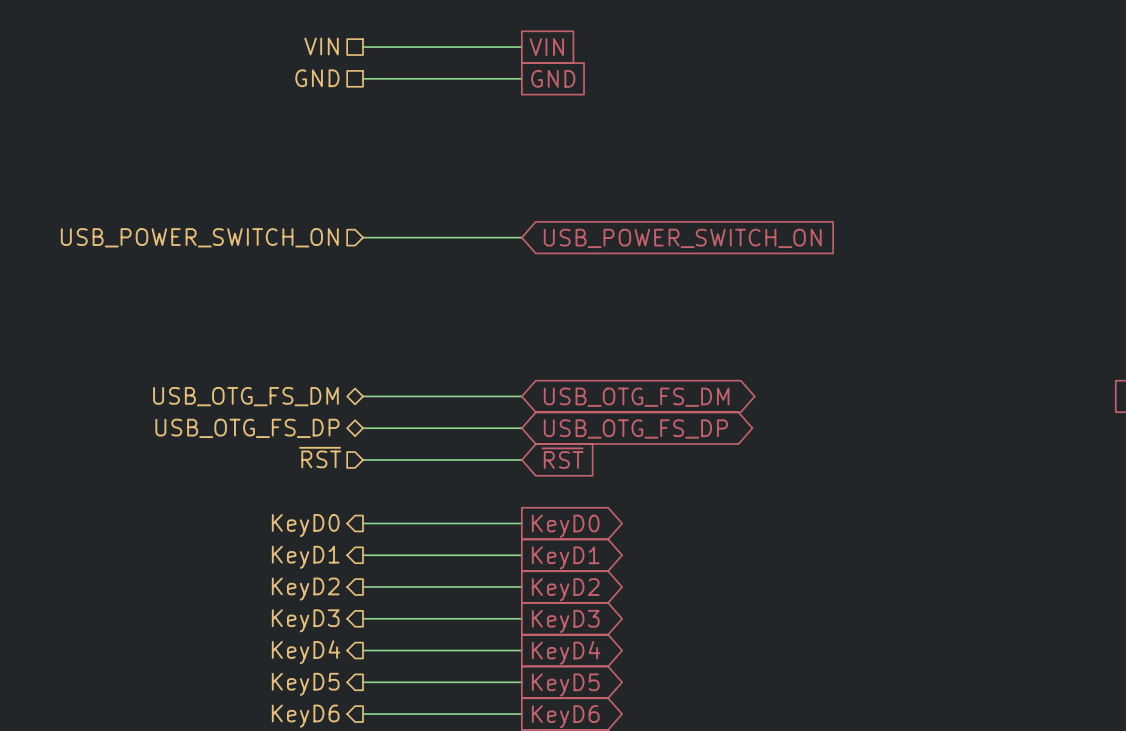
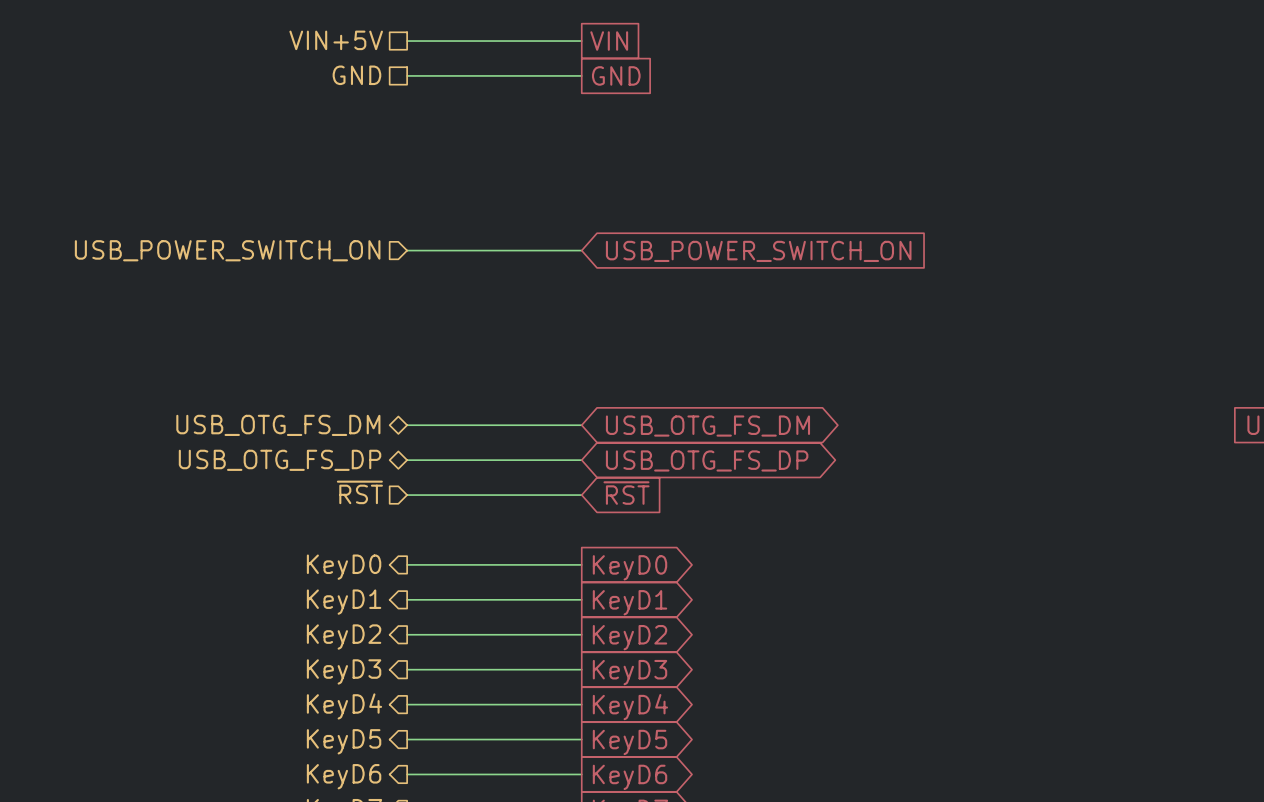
hierarchical label: VIN (321, 46) -> VIN+5V (336, 40)

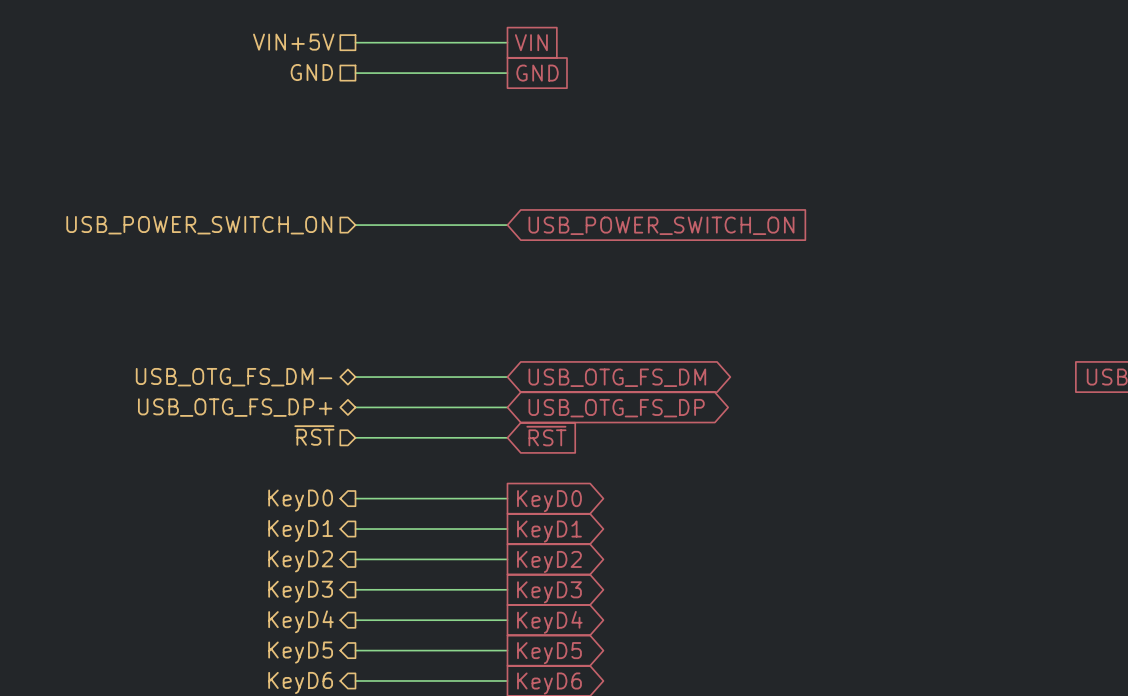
hierarchical label: USB_OTG_FS_DM (278, 425) -> USB_OTG_FS_DM- (234, 377)
hierarchical label: USB_OTG_FS_DP (280, 460) -> USB_OTG_FS_DP+ (235, 407)

